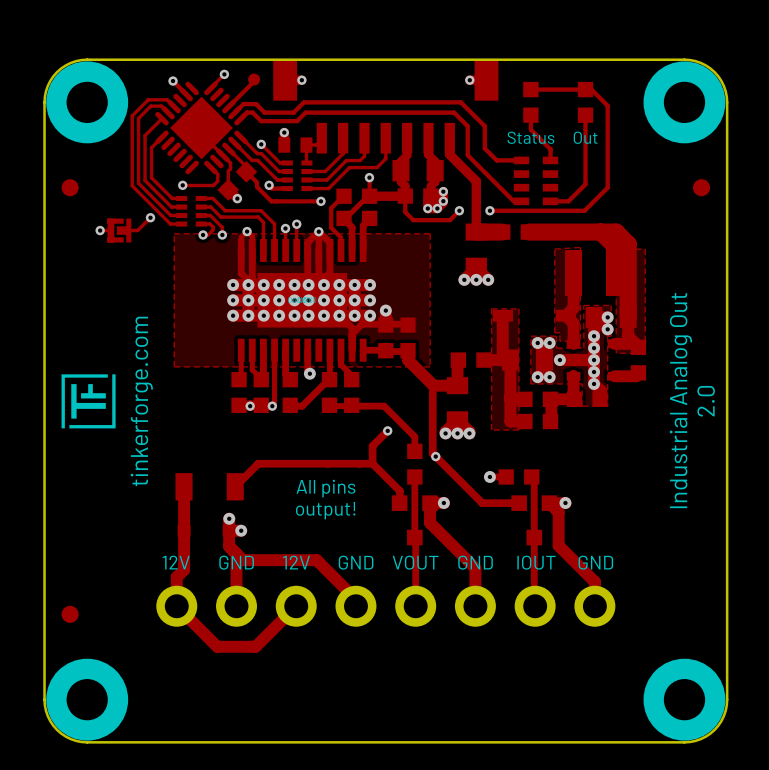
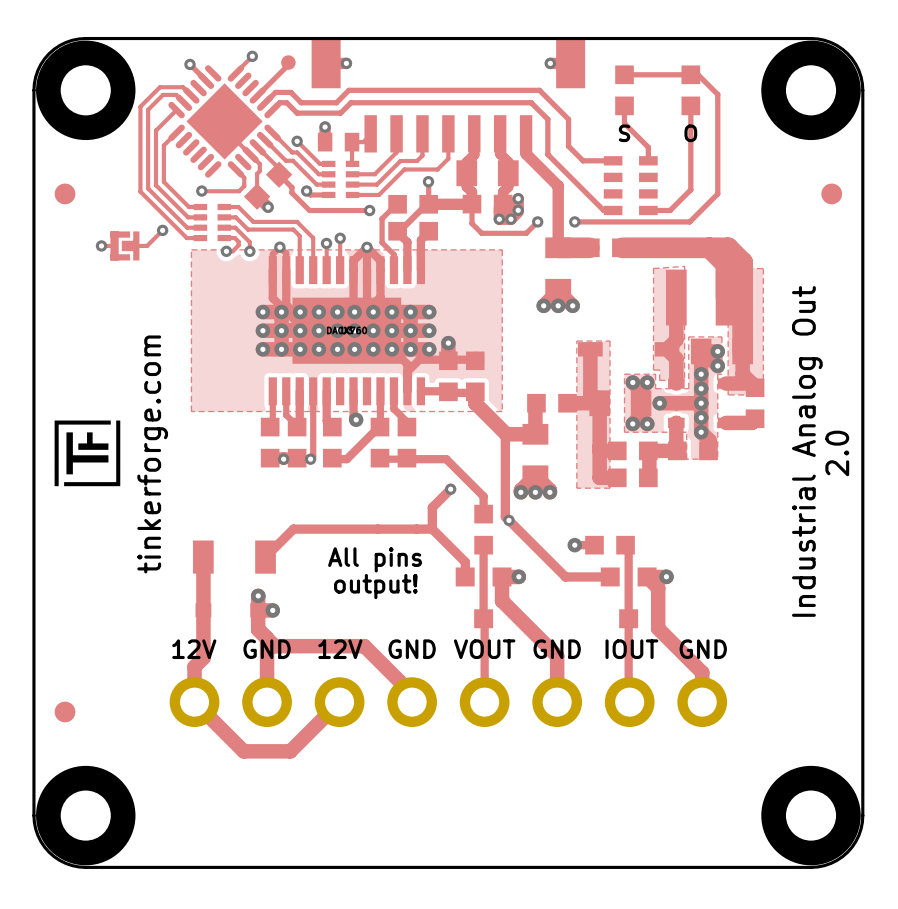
text: Status (530, 137) -> S (624, 133)
text: Out (585, 137) -> O (690, 133)

